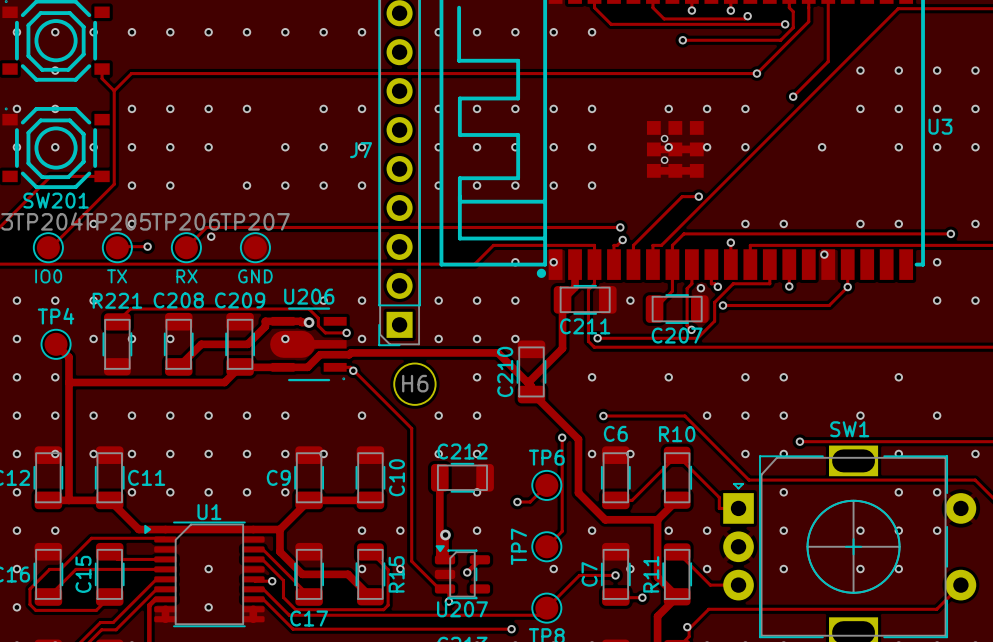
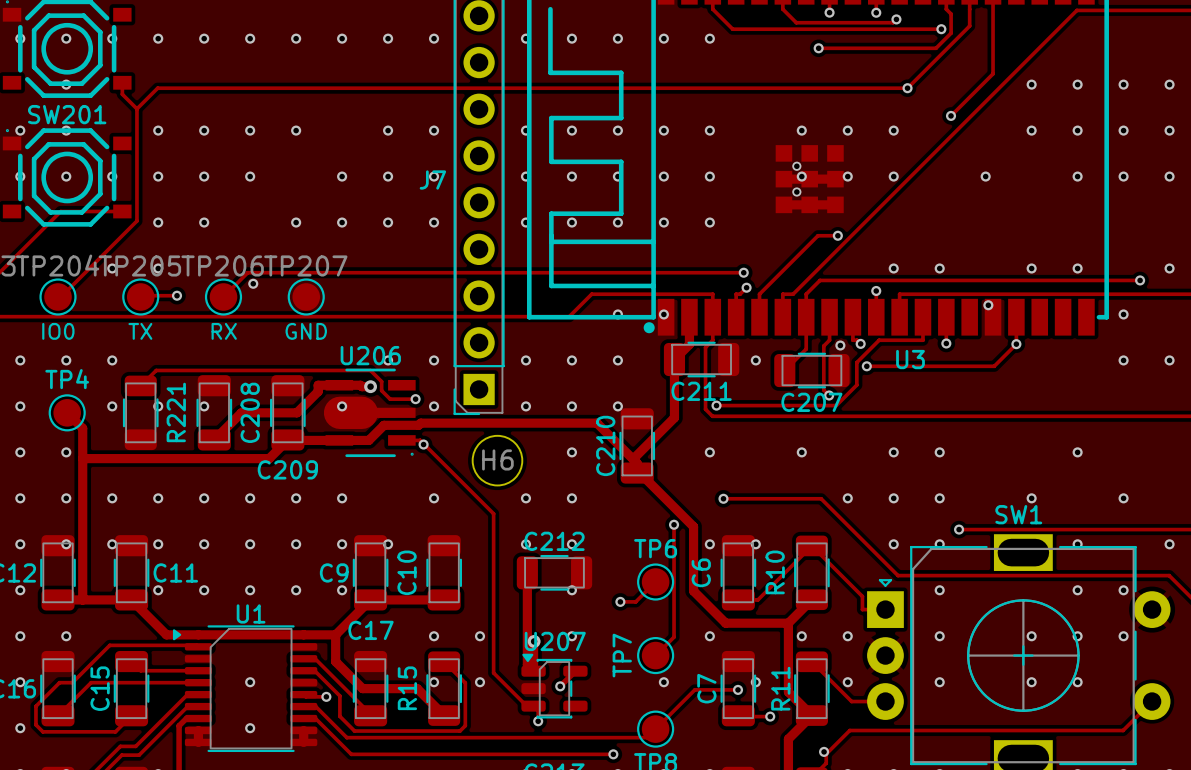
U3 name position: U3 (940, 126) -> U3 (910, 359)
SW201 name position: SW201 (56, 200) -> SW201 (67, 114)
R221 name rotation: 0° (117, 300) -> 90° counterclockwise (176, 412)
C208 name rotation: 0° (178, 300) -> 90° counterclockwise (250, 412)
C209 name position: C209 (240, 300) -> C209 (287, 469)
C6 name rotation: 0° (615, 433) -> 90° counterclockwise (701, 572)
C6 name position: C6 (615, 433) -> C6 (701, 572)
R10 name rotation: 0° (677, 434) -> 90° counterclockwise (775, 572)
R10 name position: R10 (677, 434) -> R10 (775, 572)
C10 name position: C10 (396, 477) -> C10 (407, 572)
R15 name position: R15 (396, 574) -> R15 (407, 688)
U207 name position: U207 (462, 609) -> U207 (555, 641)
C17 name position: C17 (309, 618) -> C17 (370, 630)

